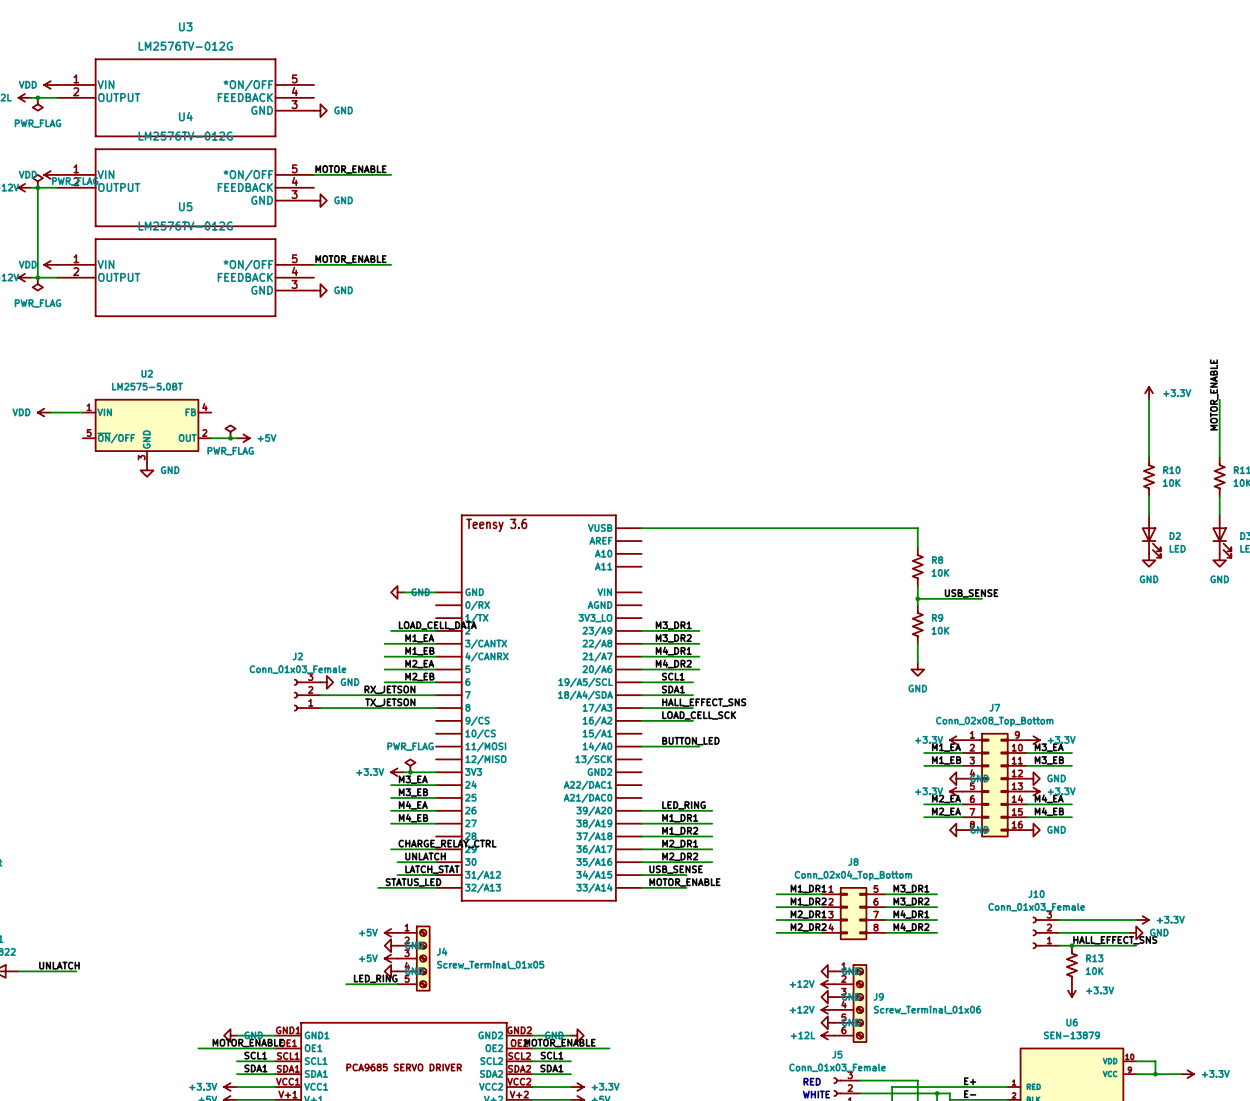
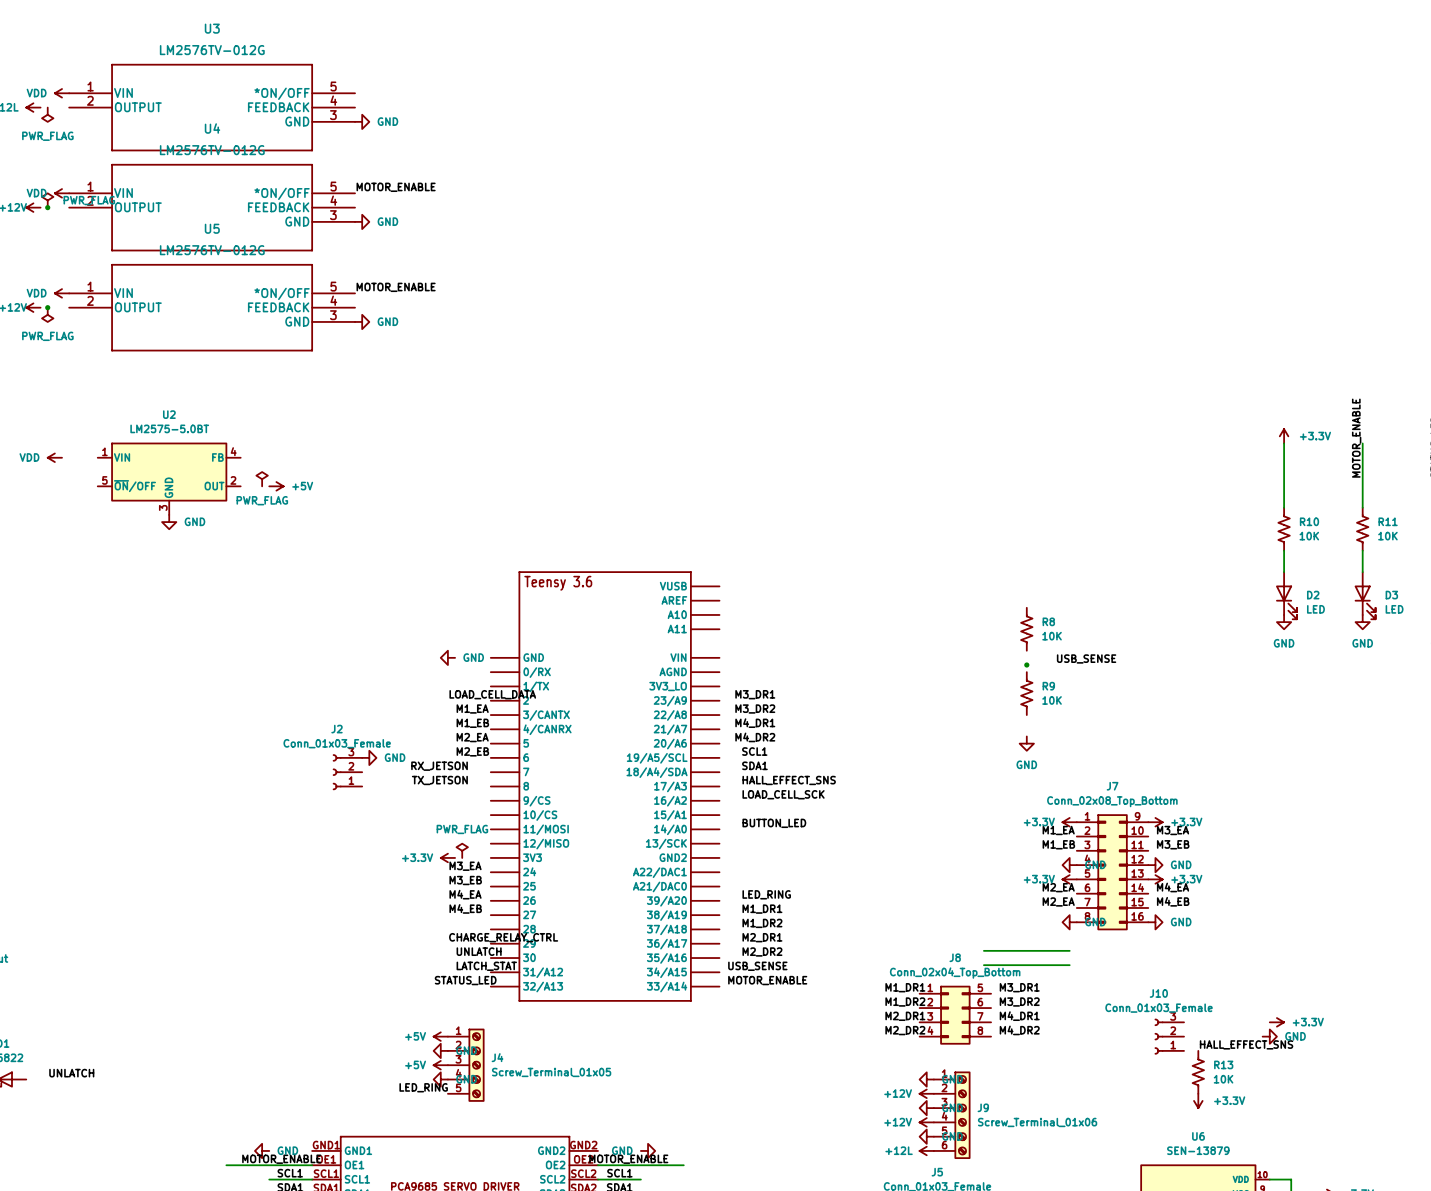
wire: (31, 97) (57, 97) -> none
junction: (37, 97) -> none
wire: (314, 174) (391, 174) -> none
wire: (31, 187) (57, 187) -> none
wire: (37, 187) (37, 277) -> none
wire: (314, 264) (391, 264) -> none
wire: (31, 277) (57, 277) -> none
wire: (50, 412) (82, 412) -> none
wire: (211, 438) (236, 438) -> none
junction: (230, 438) -> none
wire: (641, 528) (917, 528) (917, 547) -> none
wire: (917, 586) (917, 605) -> none
wire: (403, 592) (436, 592) -> none
wire: (917, 598) (982, 598) -> none
wire: (391, 630) (436, 630) -> none
wire: (641, 630) (699, 630) -> none
wire: (384, 643) (436, 643) -> none
wire: (641, 643) (699, 643) -> none
wire: (917, 643) (917, 663) -> none
wire: (384, 656) (436, 656) -> none
wire: (641, 656) (699, 656) -> none
wire: (384, 669) (436, 669) -> none
wire: (641, 669) (699, 669) -> none
wire: (384, 682) (436, 682) -> none
wire: (641, 682) (692, 682) -> none
wire: (320, 695) (436, 695) -> none
wire: (641, 695) (692, 695) -> none
wire: (320, 708) (436, 708) -> none
wire: (641, 708) (692, 708) -> none
wire: (641, 720) (692, 720) -> none
wire: (641, 746) (699, 746) -> none
wire: (924, 753) (962, 753) -> none
wire: (1026, 753) (1071, 753) -> none
wire: (924, 765) (962, 765) -> none
wire: (1026, 765) (1071, 765) -> none
wire: (403, 772) (436, 772) -> none
junction: (410, 772) -> none
wire: (391, 785) (436, 785) -> none
wire: (391, 797) (436, 797) -> none
wire: (924, 804) (962, 804) -> none
wire: (1026, 804) (1071, 804) -> none
wire: (391, 810) (436, 810) -> none
wire: (641, 810) (712, 810) -> none
wire: (924, 817) (962, 817) -> none
wire: (1026, 817) (1071, 817) -> none
wire: (391, 823) (436, 823) -> none
wire: (641, 823) (712, 823) -> none
wire: (641, 836) (712, 836) -> none
wire: (391, 849) (436, 849) -> none
wire: (641, 849) (712, 849) -> none
wire: none -> (983, 950) (1069, 950)
wire: (397, 862) (436, 862) -> none
wire: (641, 862) (712, 862) -> none
wire: none -> (983, 965) (1069, 965)
wire: (397, 875) (436, 875) -> none
wire: (641, 875) (686, 875) -> none
wire: (378, 887) (436, 887) -> none
wire: (641, 887) (686, 887) -> none
wire: (776, 894) (821, 894) -> none
wire: (885, 894) (937, 894) -> none
wire: (776, 907) (821, 907) -> none
wire: (885, 907) (937, 907) -> none
wire: (776, 920) (821, 920) -> none
wire: (885, 920) (937, 920) -> none
wire: (1059, 920) (1136, 920) -> none
wire: (776, 932) (821, 932) -> none
wire: (885, 932) (937, 932) -> none
wire: (1059, 932) (1129, 932) -> none
wire: (1059, 945) (1136, 945) -> none
junction: (1071, 945) -> none
wire: (18, 971) (76, 971) -> none
wire: (346, 984) (397, 984) -> none
wire: (236, 1035) (275, 1035) -> none
wire: (532, 1035) (570, 1035) -> none

